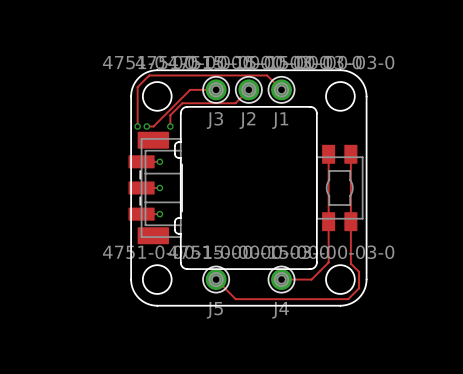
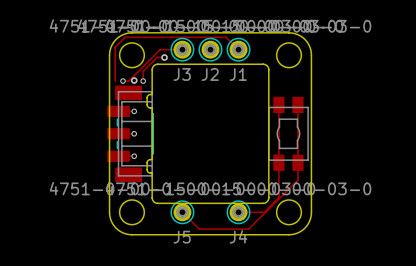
track: (248, 89) (235, 103) (182, 103) -> (164, 57) (157, 57) (153, 61)
via: none -> (164, 57)
via: none -> (134, 80)
via: (137, 126) -> none
track: (350, 241) (350, 263) (359, 271) (359, 288) (348, 299) (293, 299) -> (297, 180) (248, 229)

